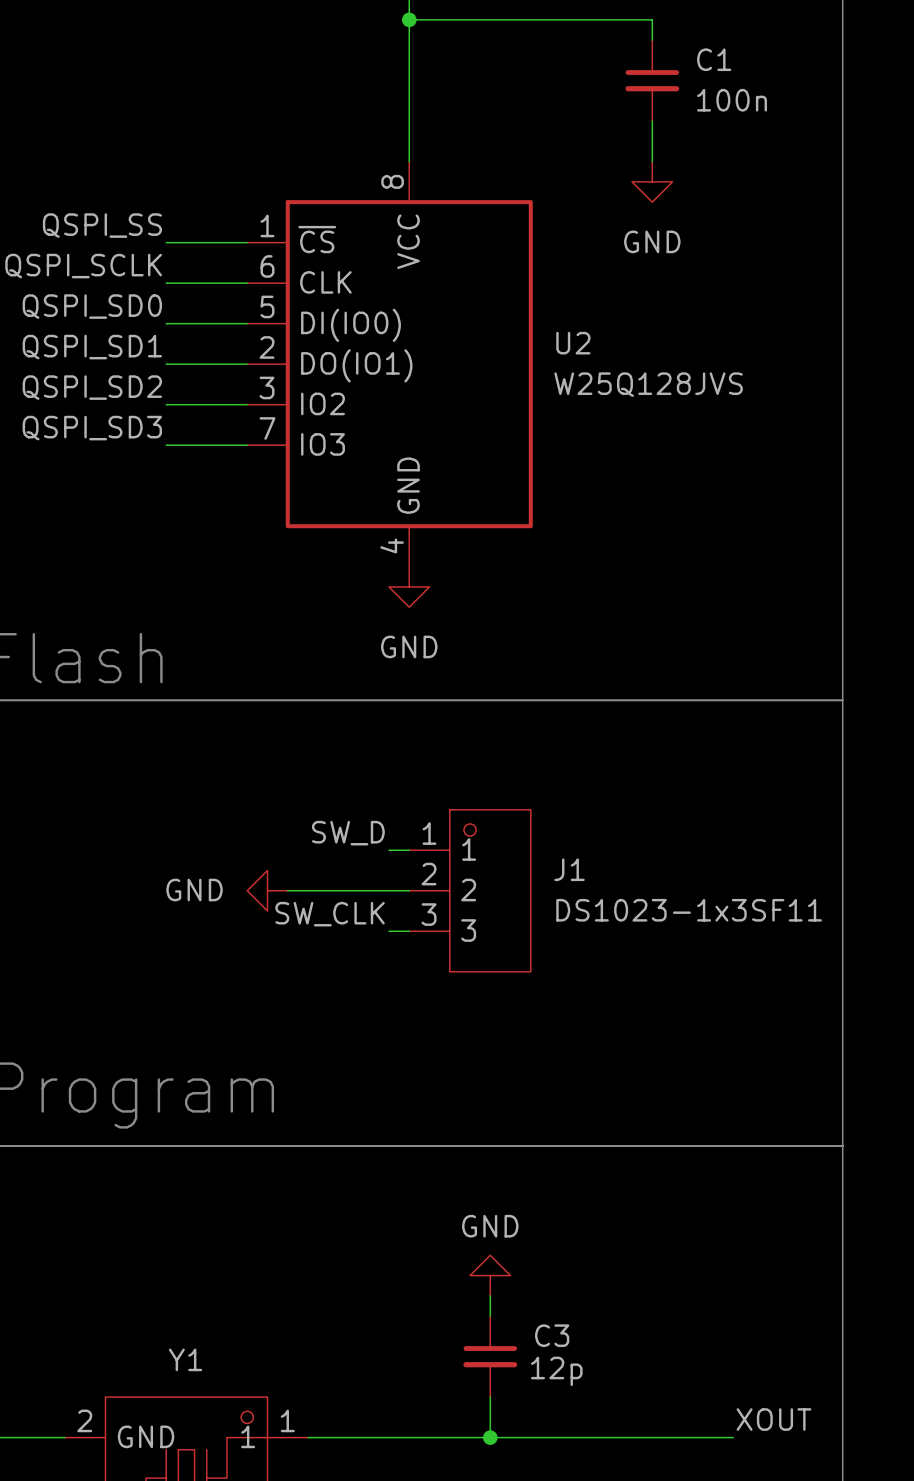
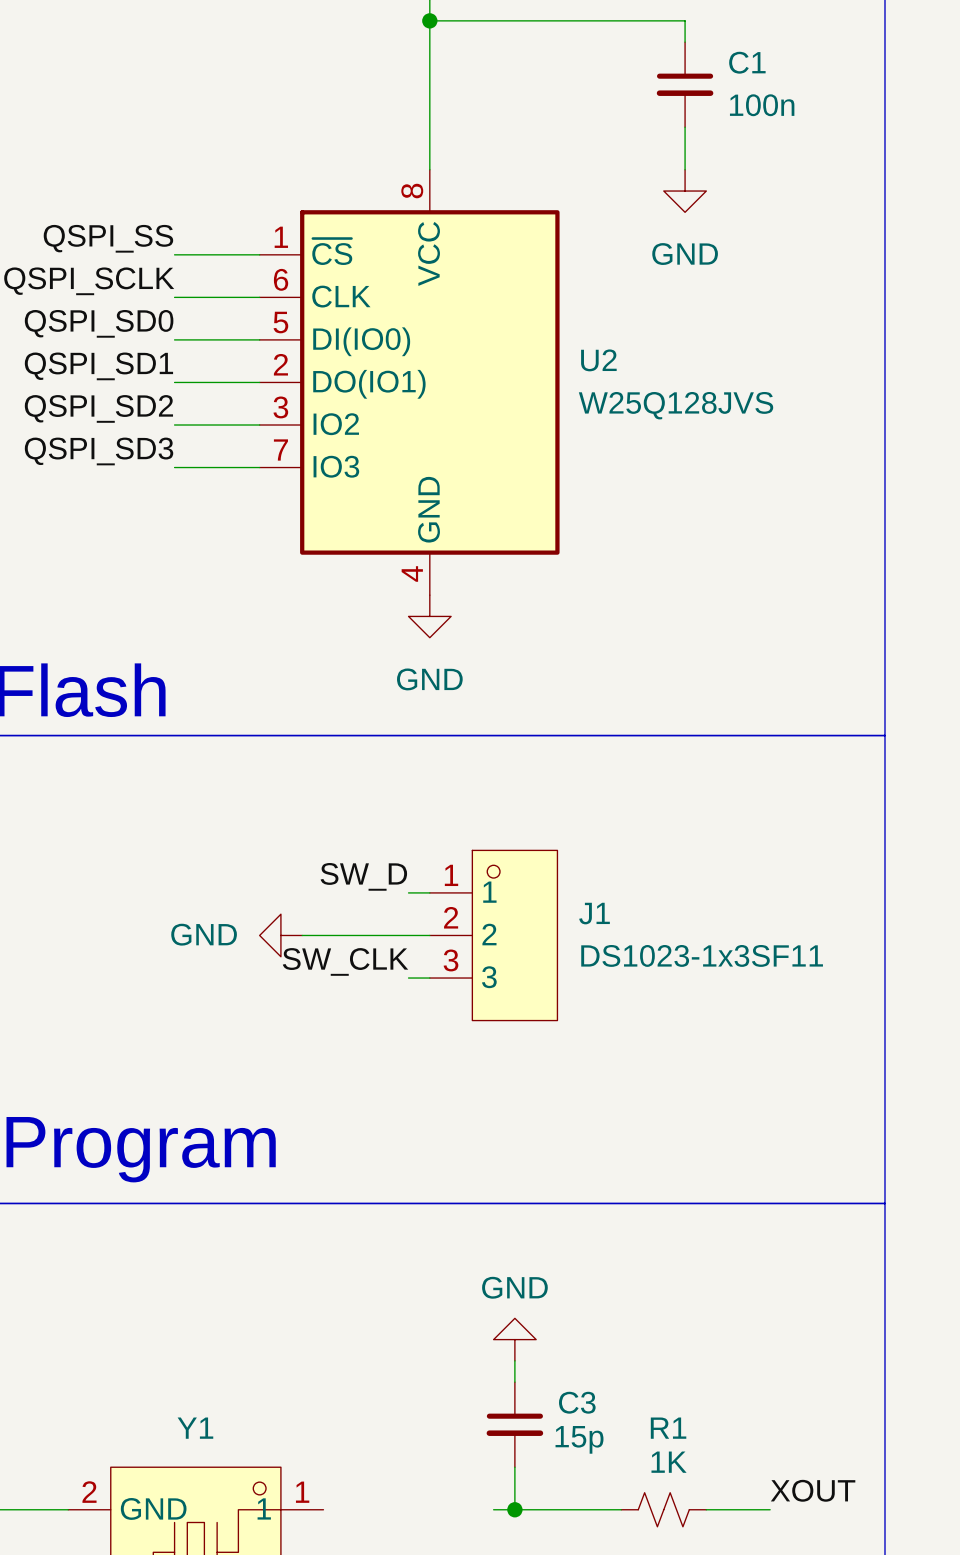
C3 value: 12p (556, 1371) -> 15p (579, 1439)
wire: (308, 1437) (470, 1437) -> none
wire: (591, 1437) (672, 1437) -> none
R1: none -> 1K (663, 1509)

